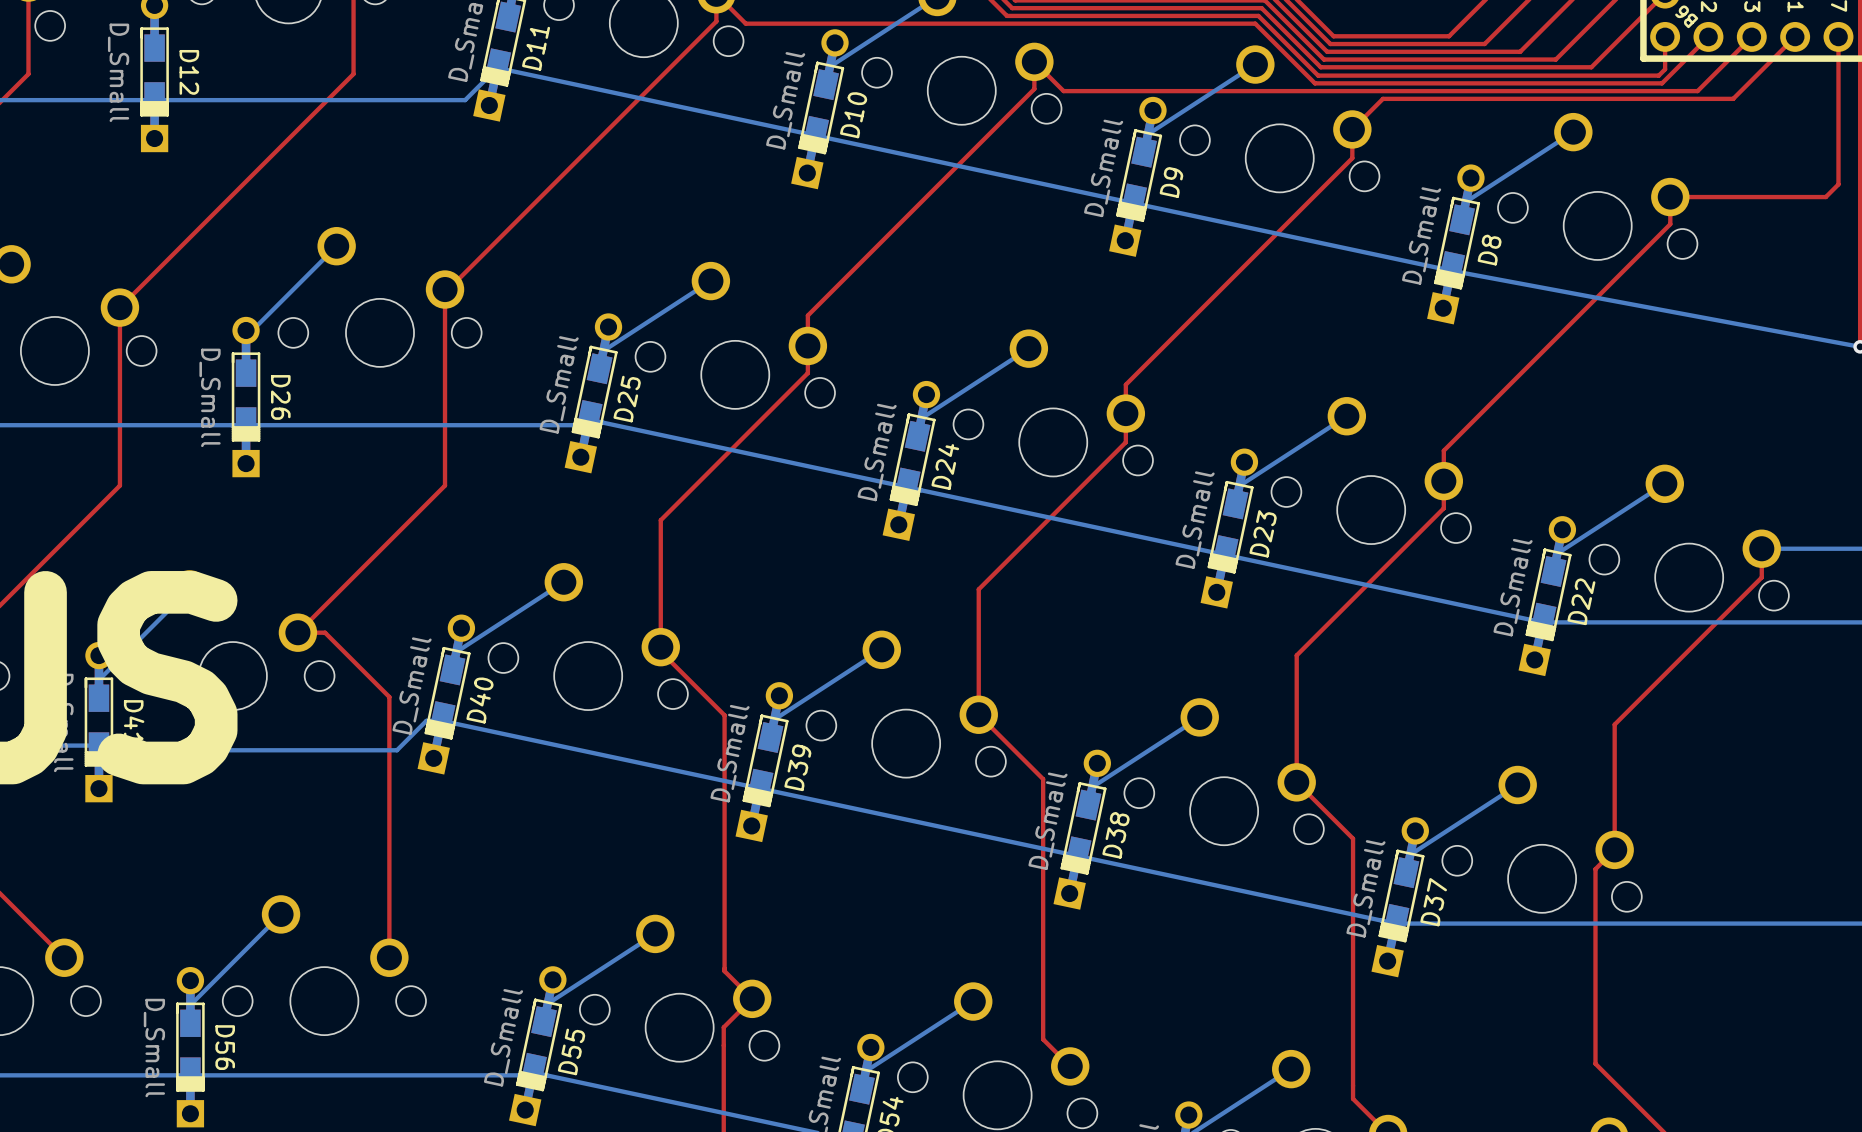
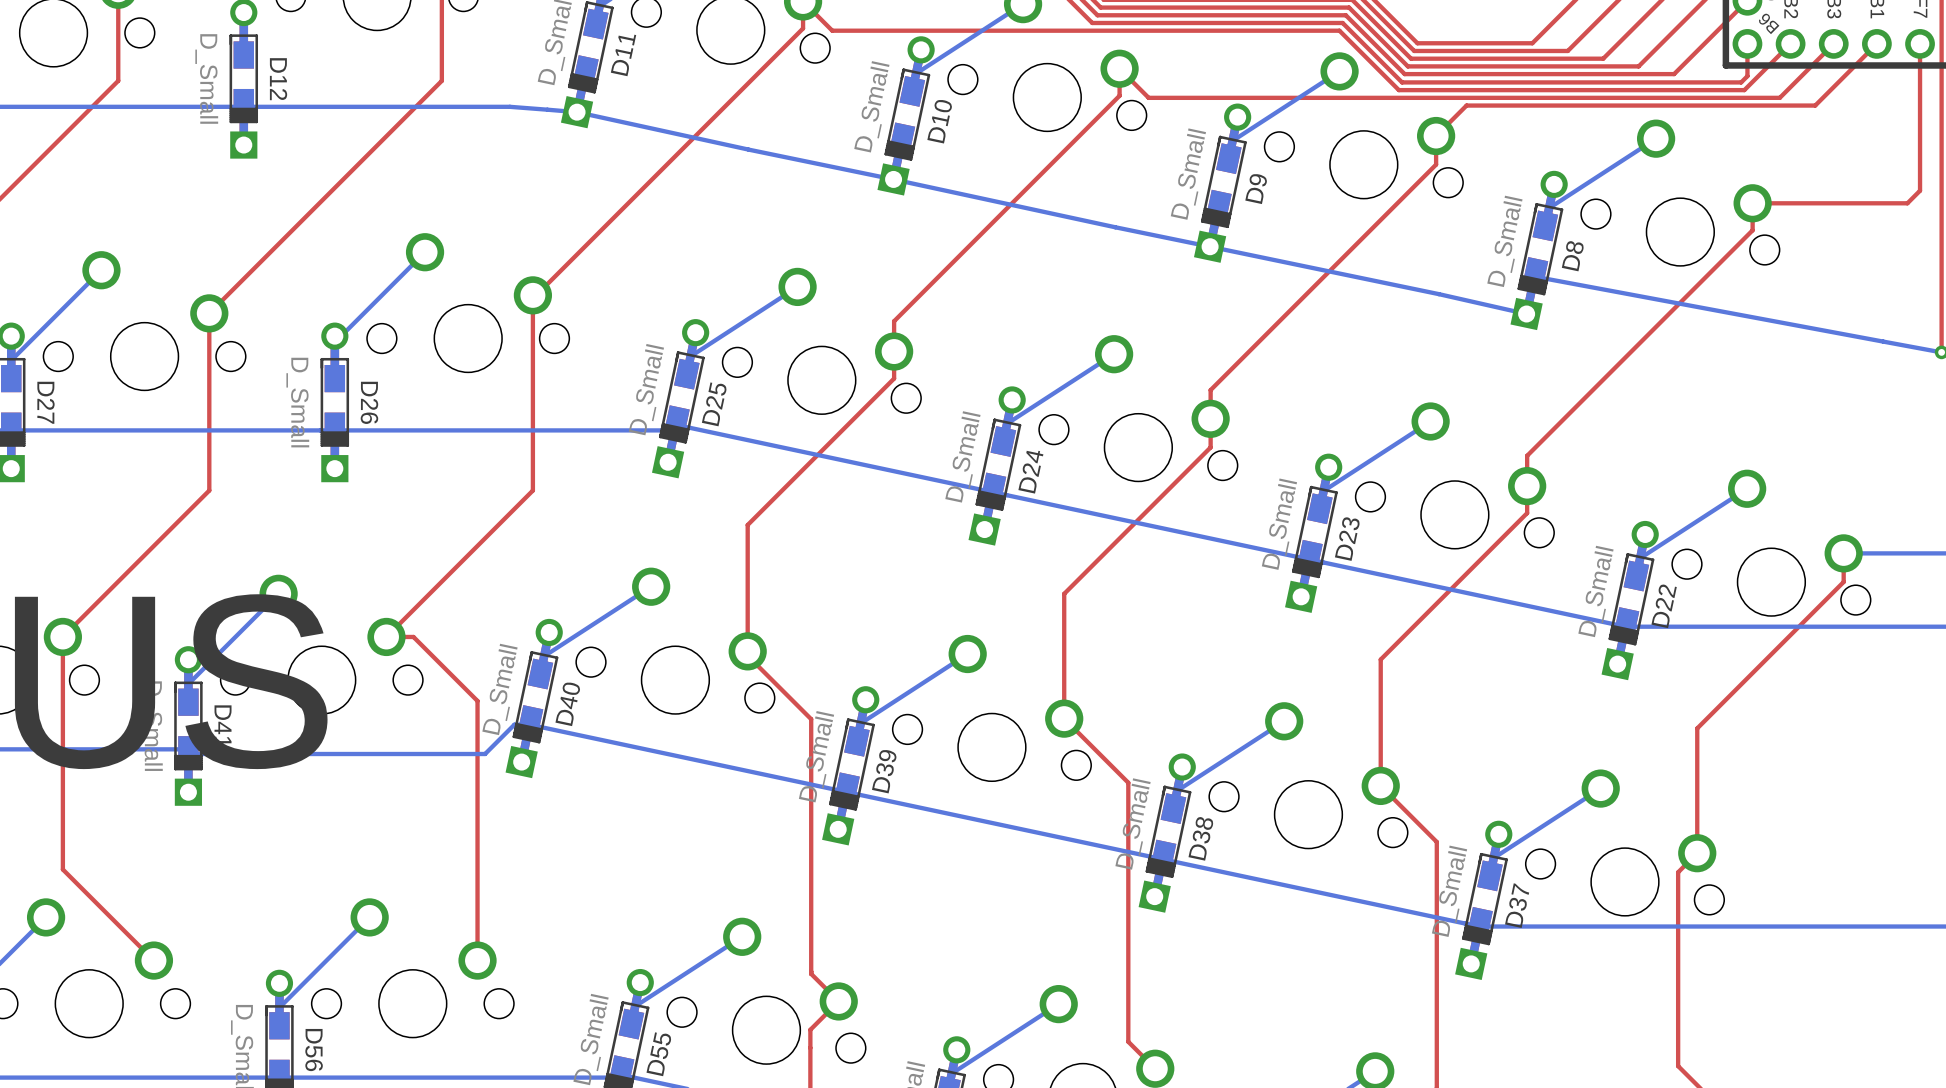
bottom track: (421, 100) (465, 100) (497, 67) (1451, 270) -> (509, 106) (577, 112) (1526, 314)

